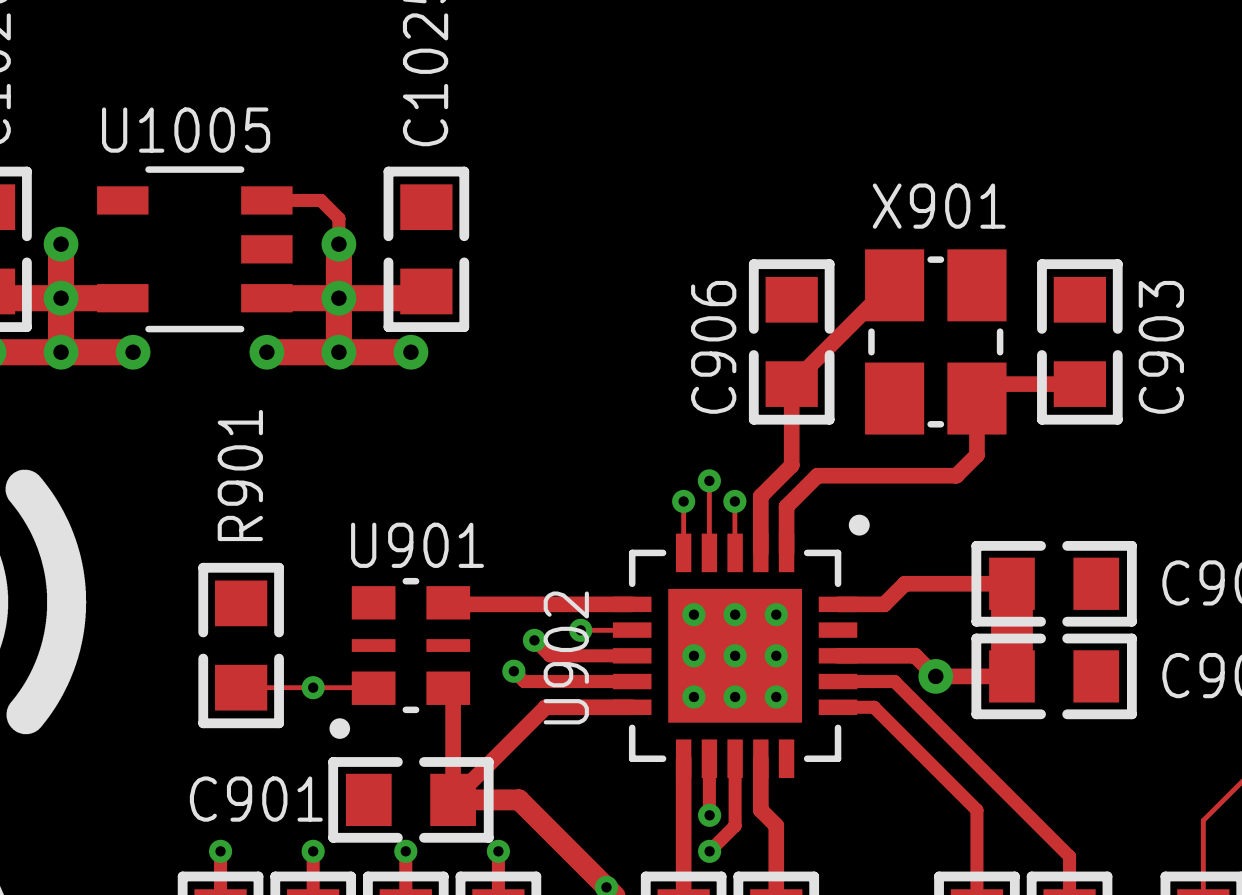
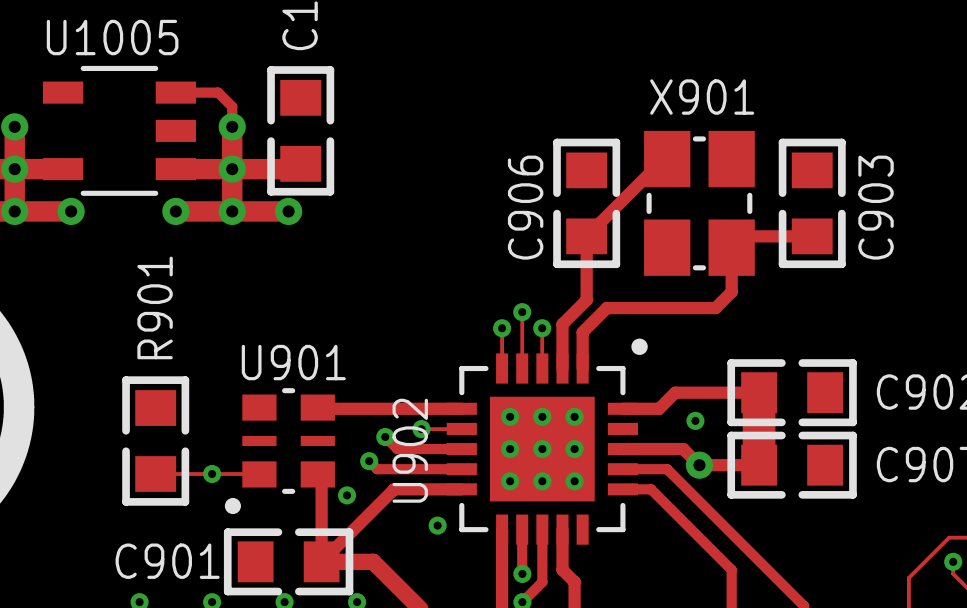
via: none -> (695, 420)
via: none -> (347, 495)
via: none -> (437, 525)

